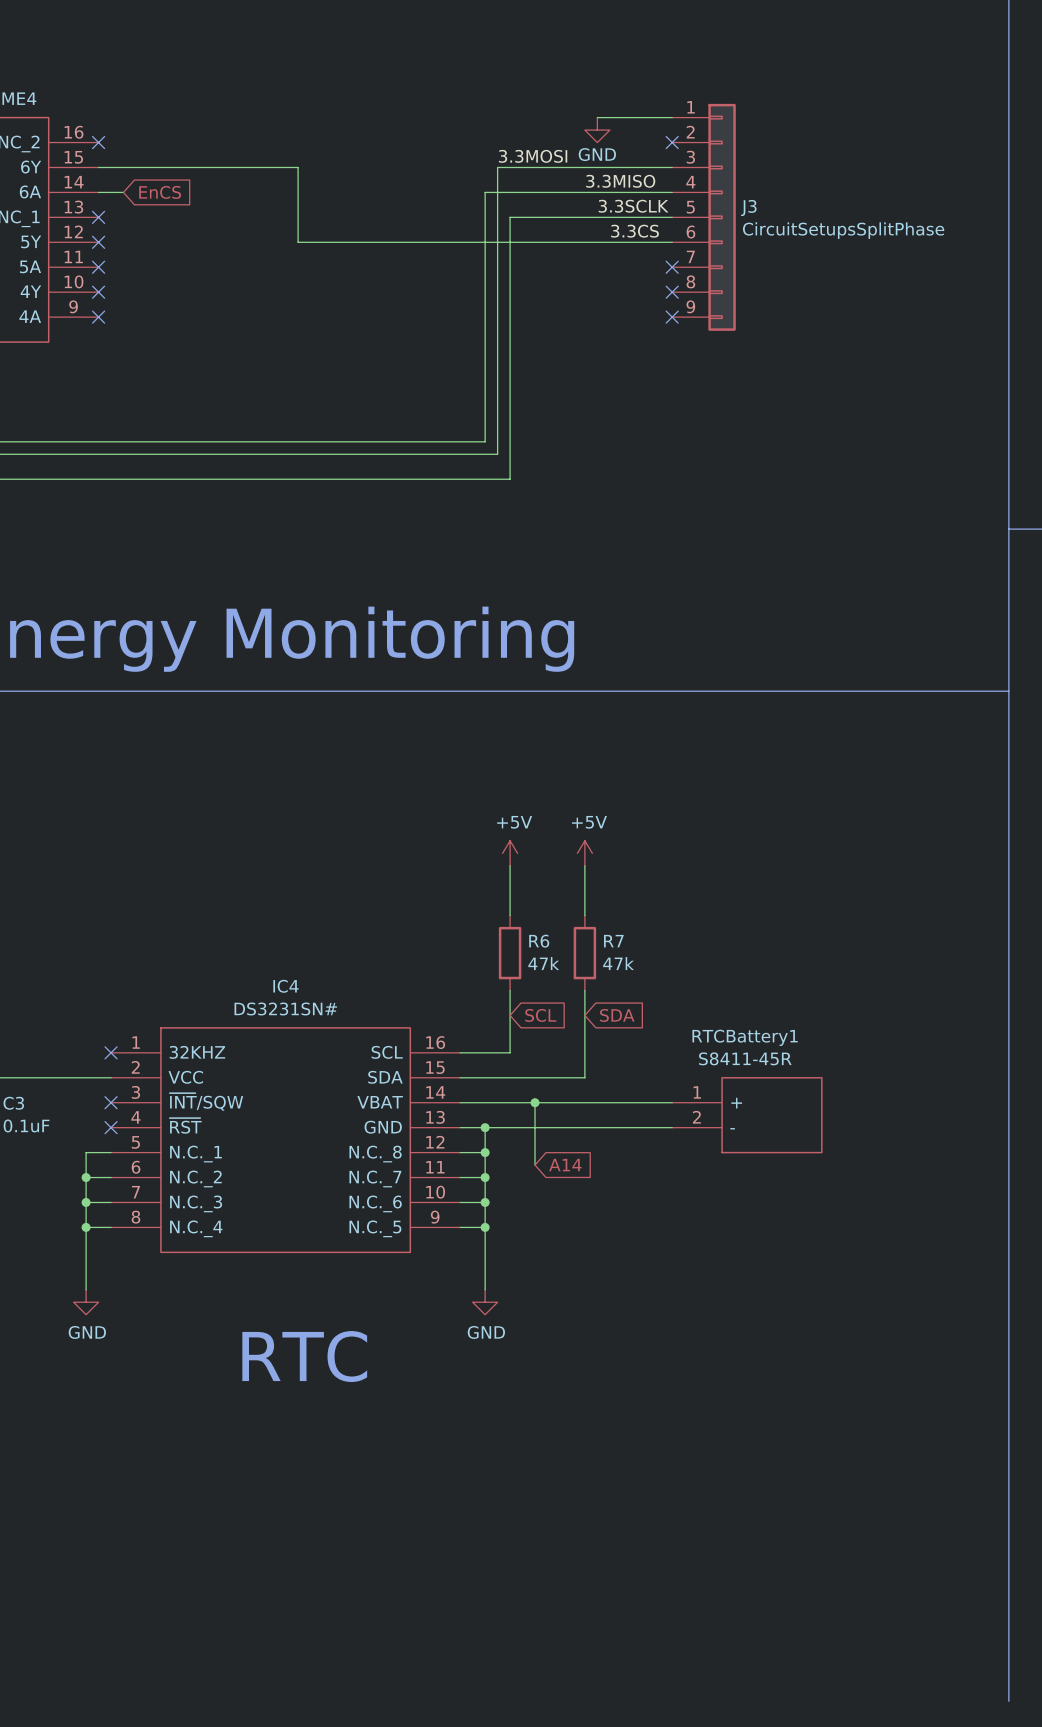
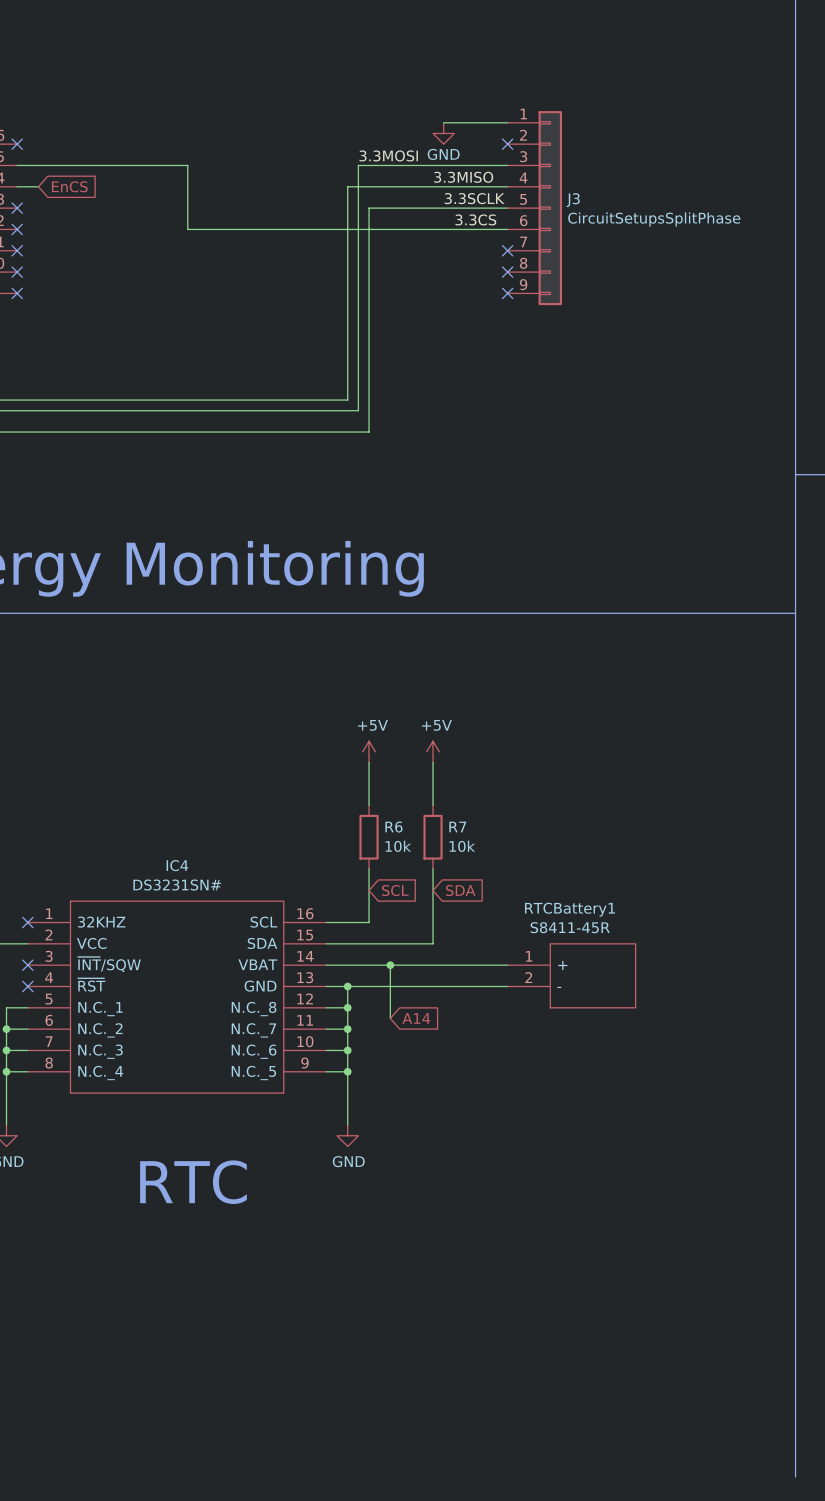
R6 value: 47k (543, 963) -> 10k (398, 846)
R7 value: 47k (618, 963) -> 10k (462, 846)

